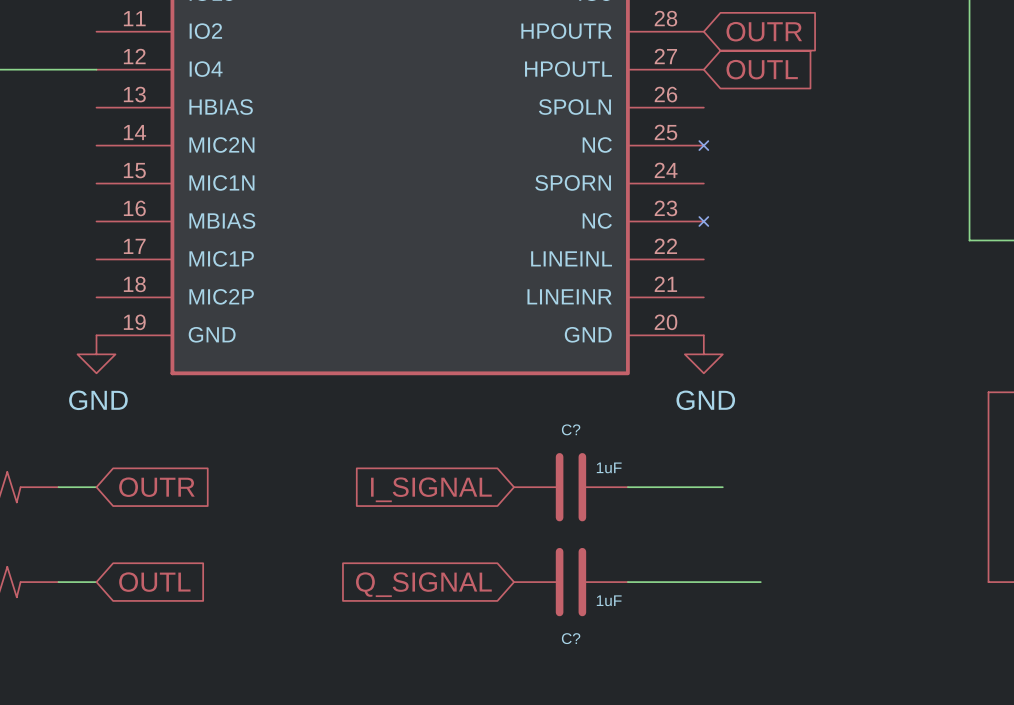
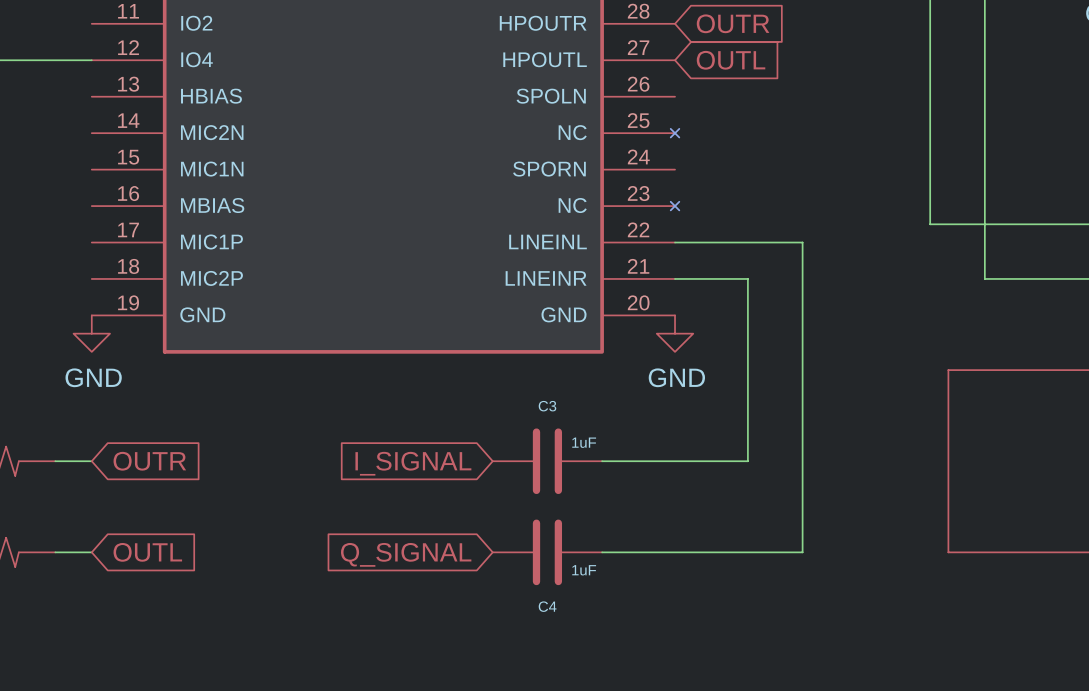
wire: none -> (675, 242) (802, 242) (802, 552) (729, 552)
wire: none -> (675, 278) (747, 278) (747, 461) (693, 461)
C? name: C? (571, 429) -> C3 (547, 406)
C? name: C? (571, 638) -> C4 (547, 606)

